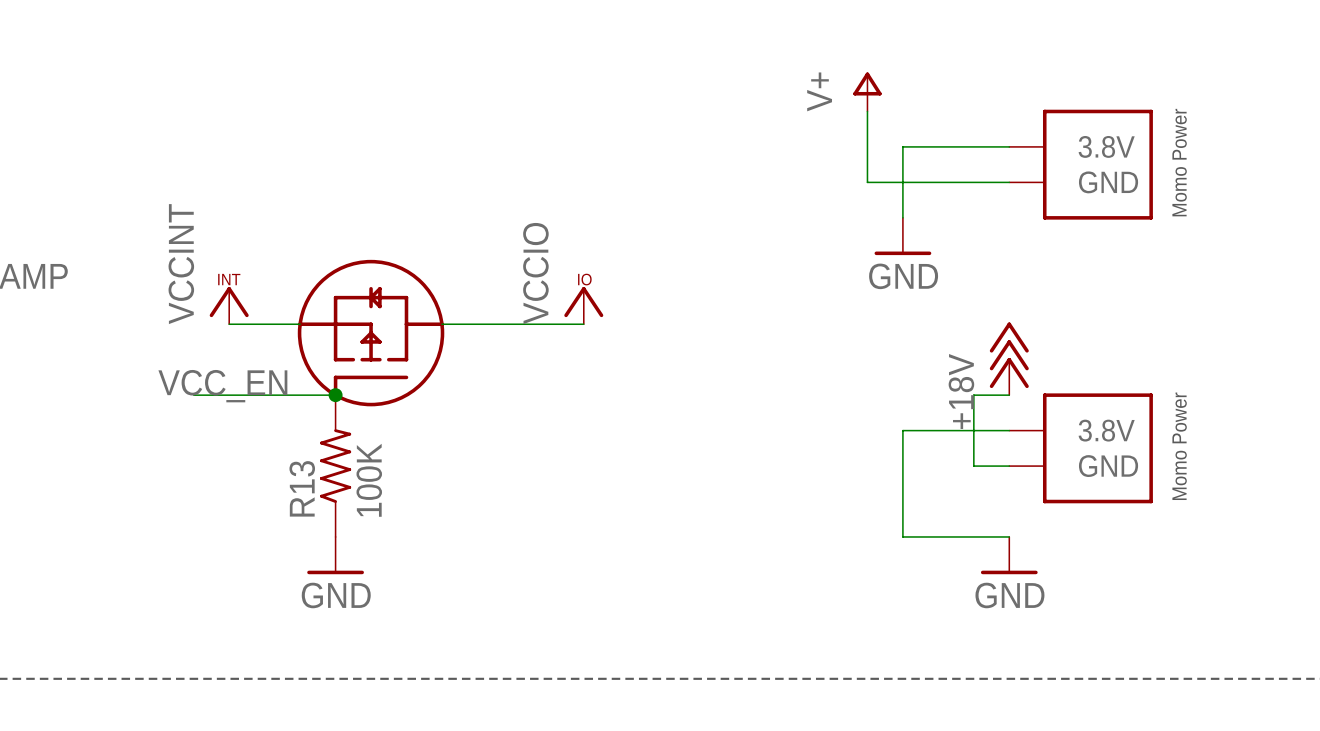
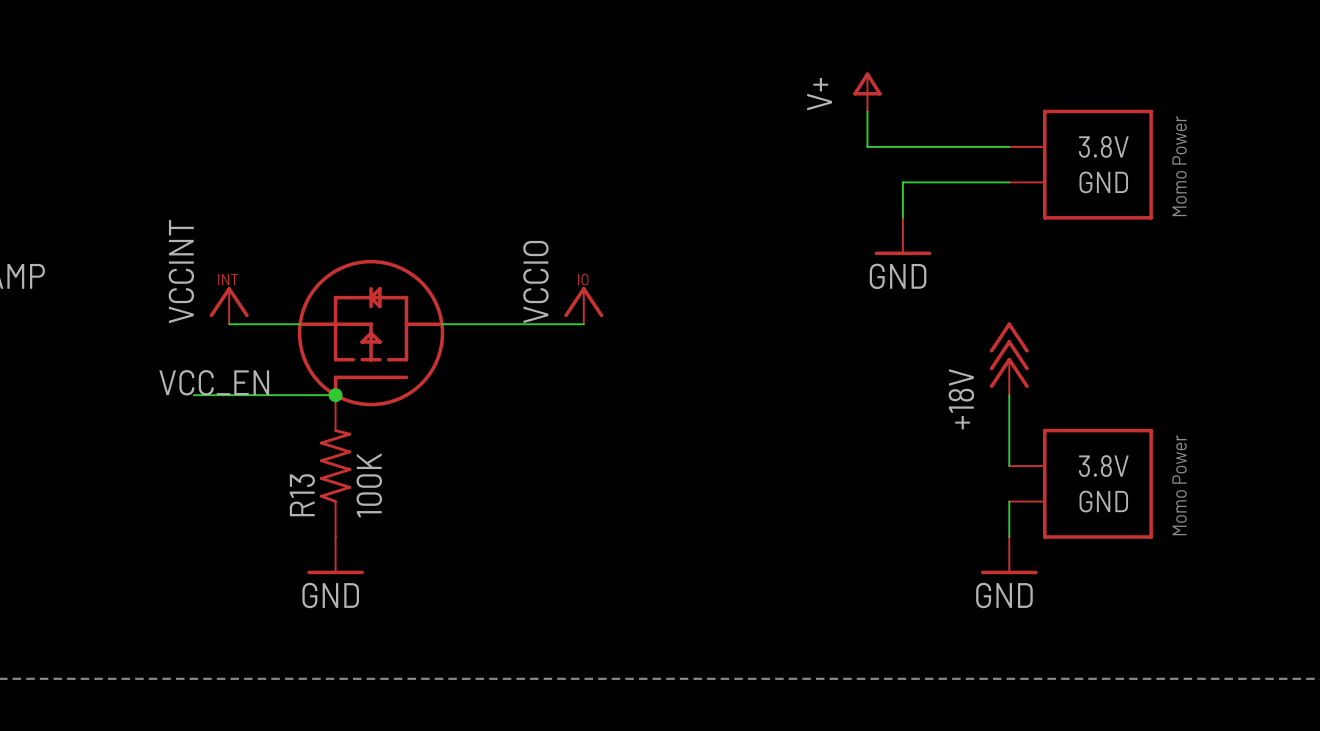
wire: (867, 146) (867, 182) (902, 182) (902, 146) -> (867, 146) (902, 146)
wire: (1009, 395) (973, 395) (973, 466) (1009, 466) -> (1009, 395) (1009, 466)
wire: (1009, 430) (902, 430) (902, 536) (1009, 536) -> (1009, 501) (1009, 536)
part position: (1081, 448) -> (1081, 483)

